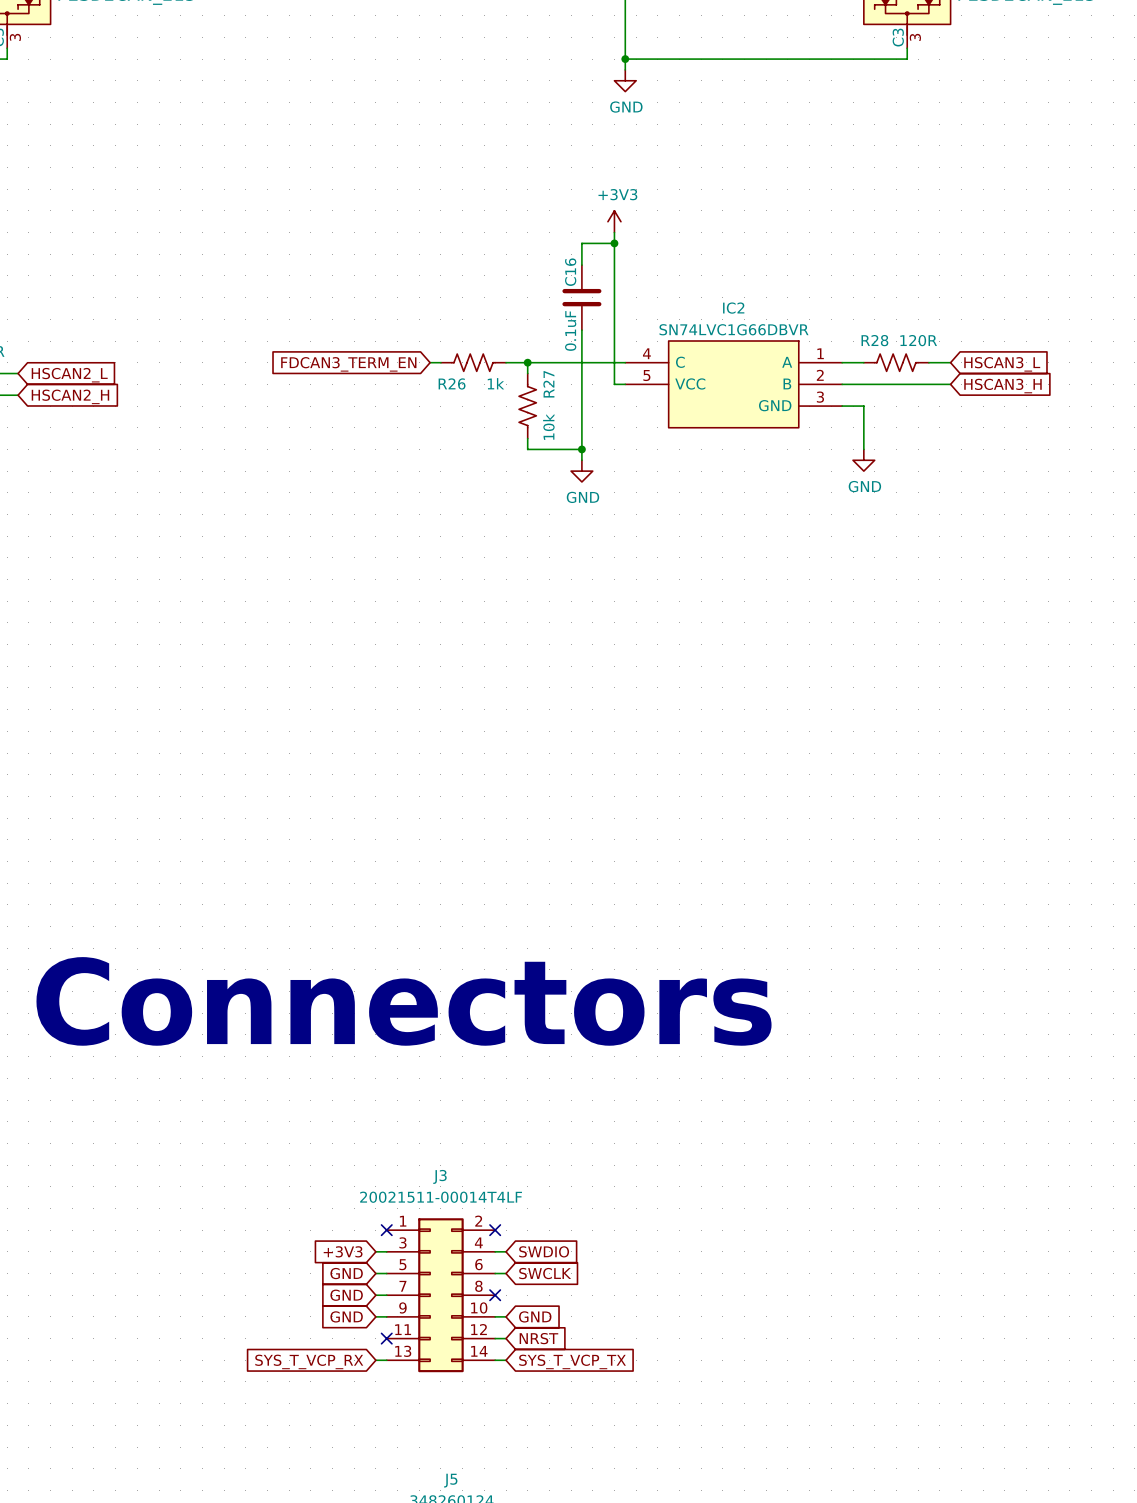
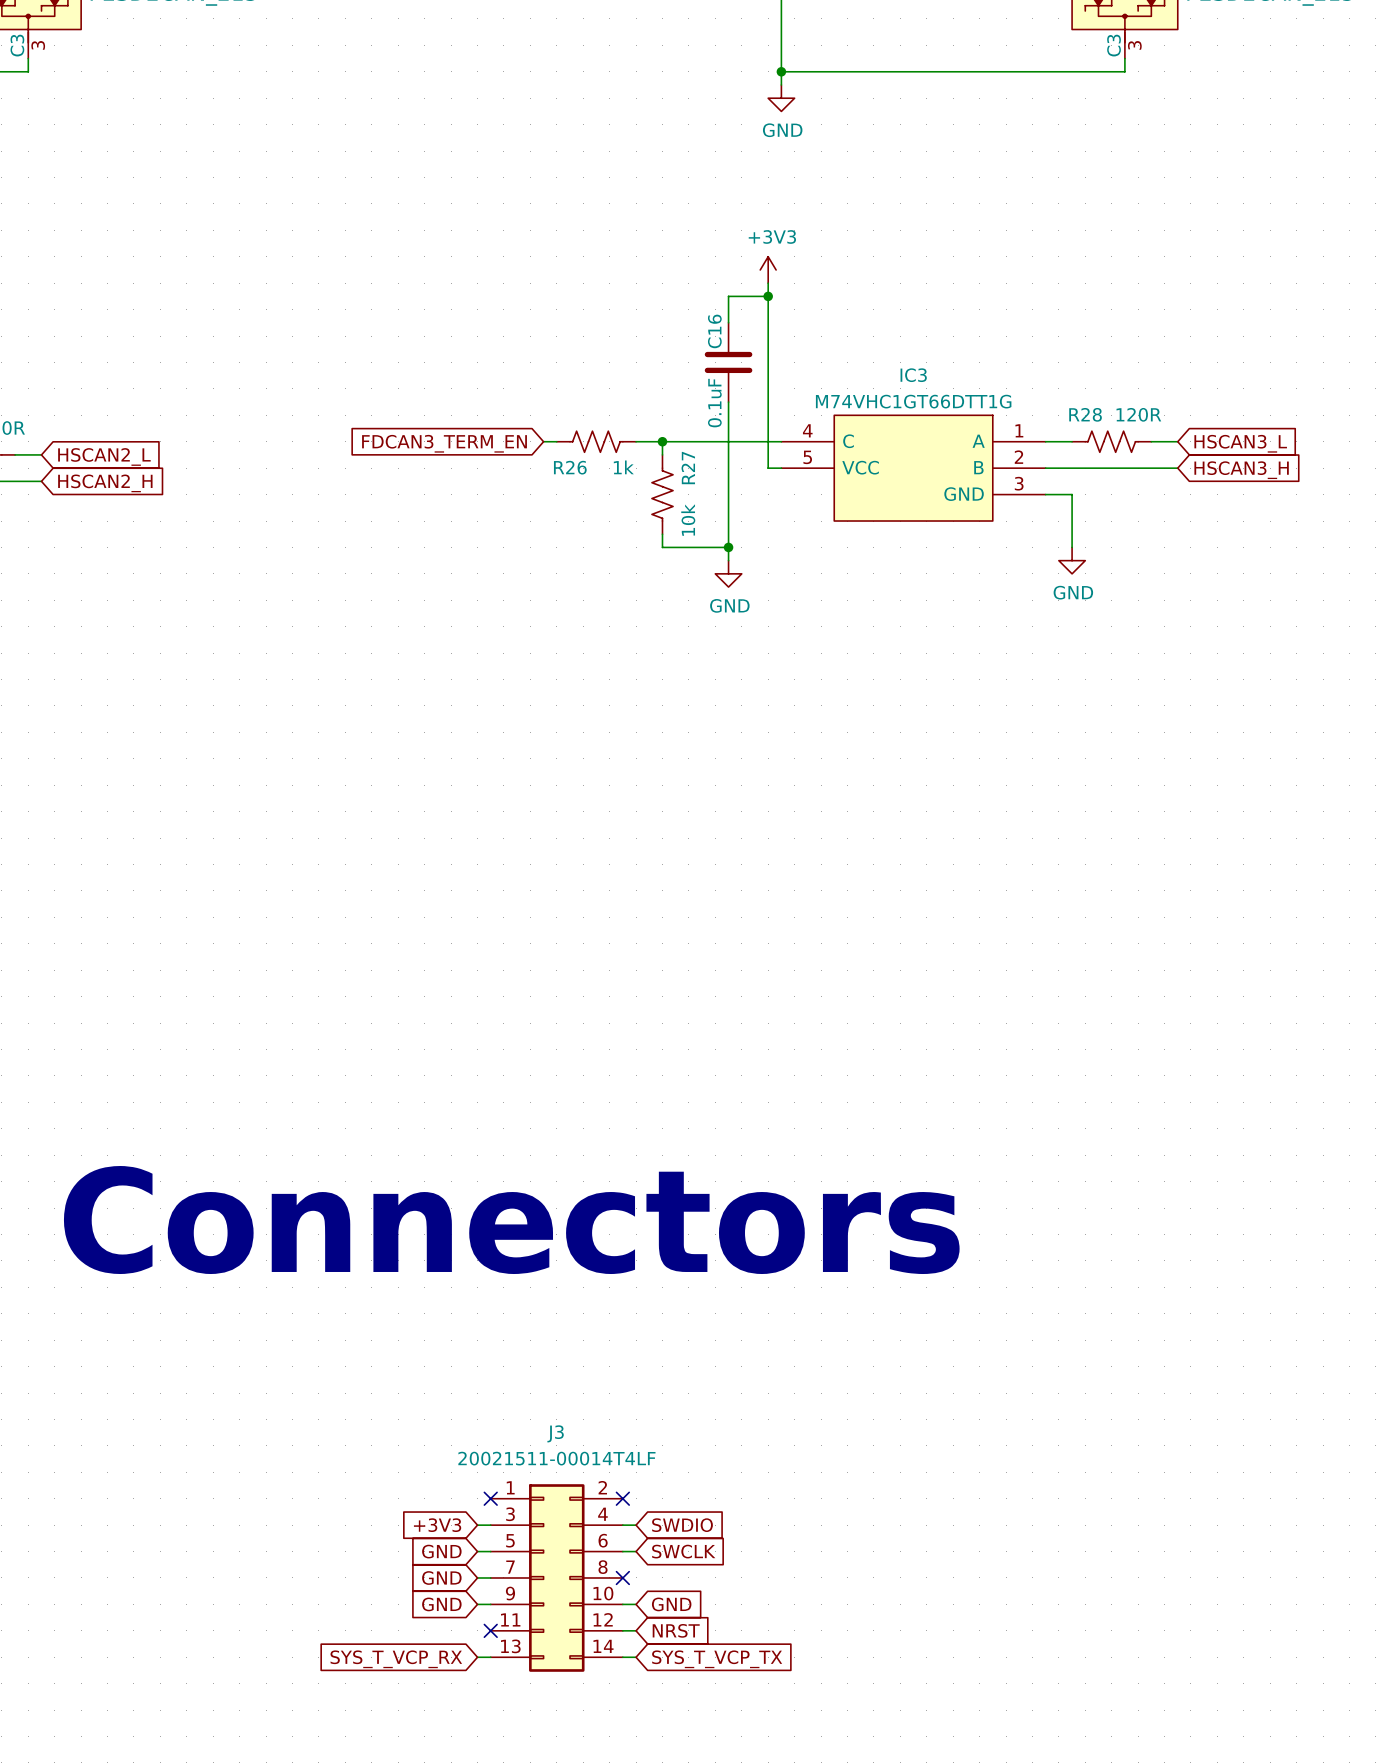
IC2 name: IC2 (733, 308) -> IC3 (913, 375)
IC2 value: SN74LVC1G66DBVR (734, 329) -> M74VHC1GT66DTT1G (913, 401)

